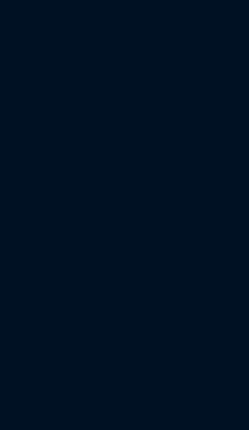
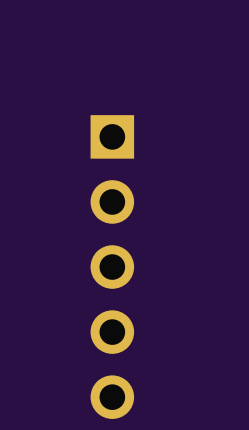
part: none -> (112, 267)

